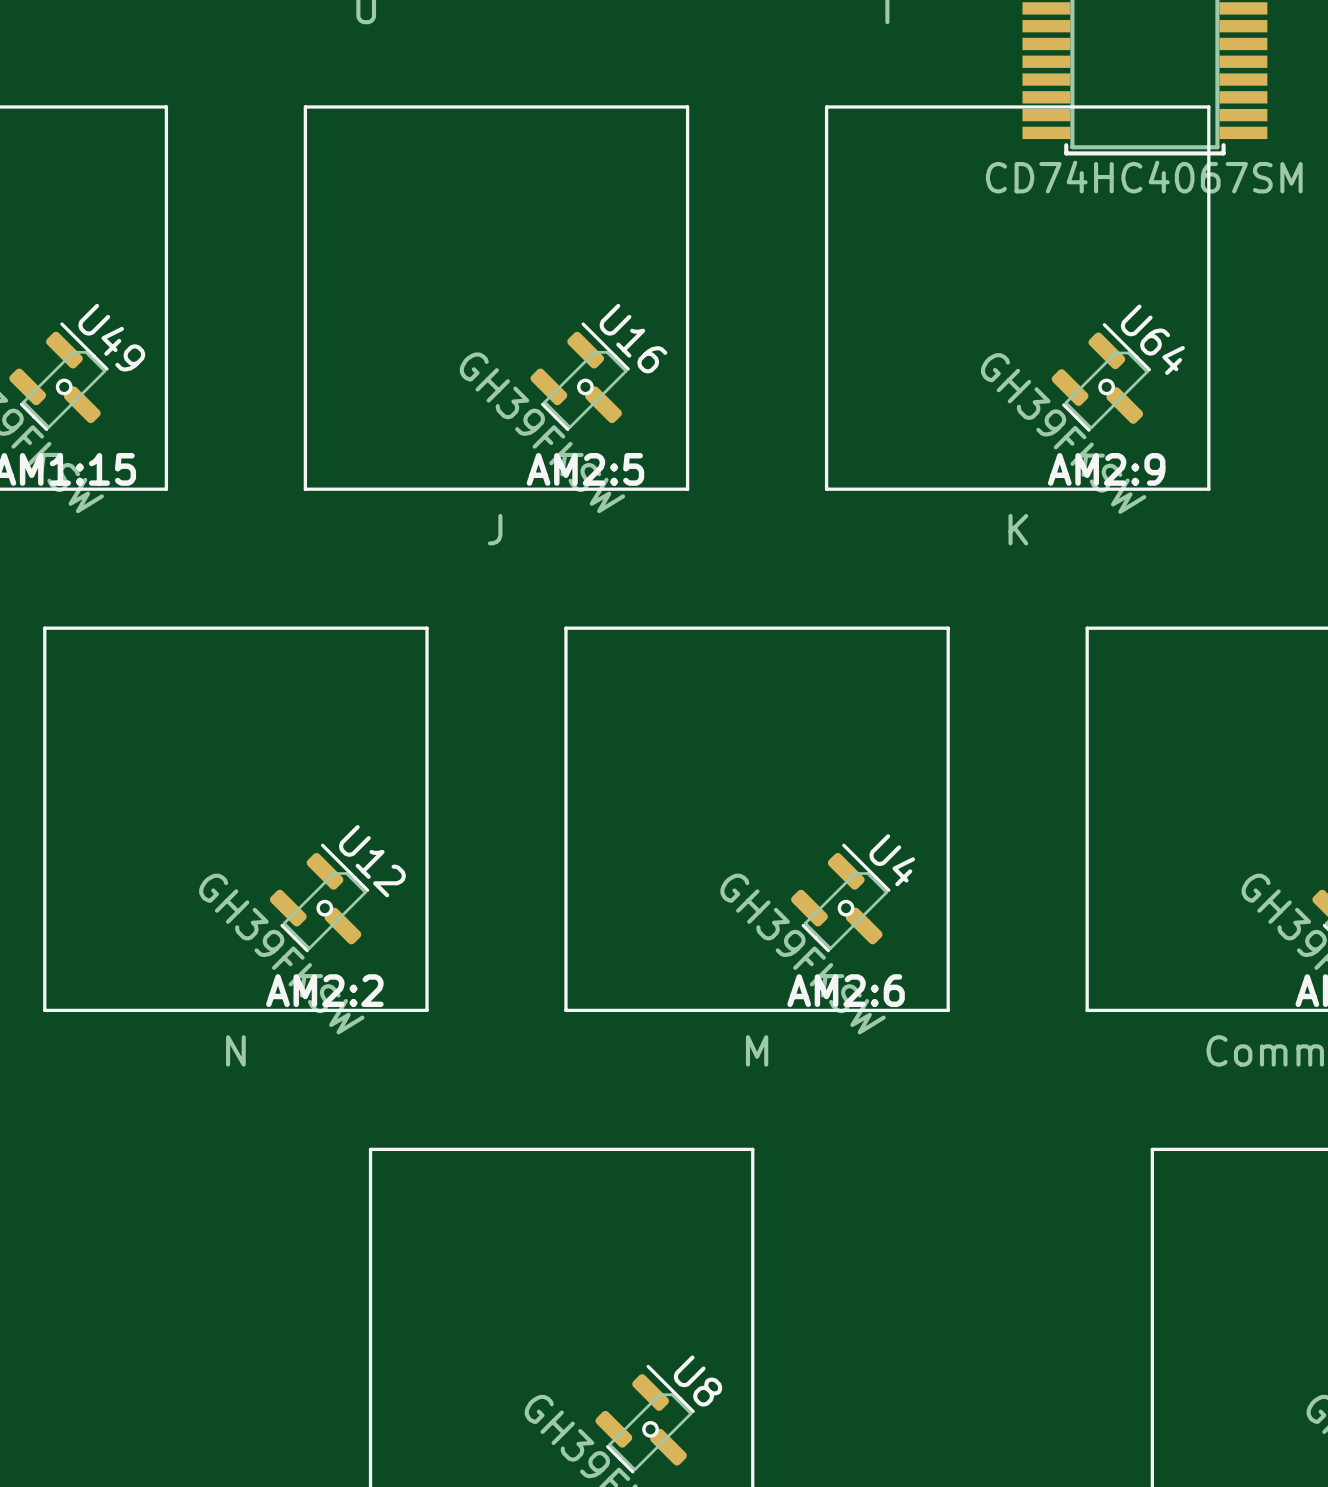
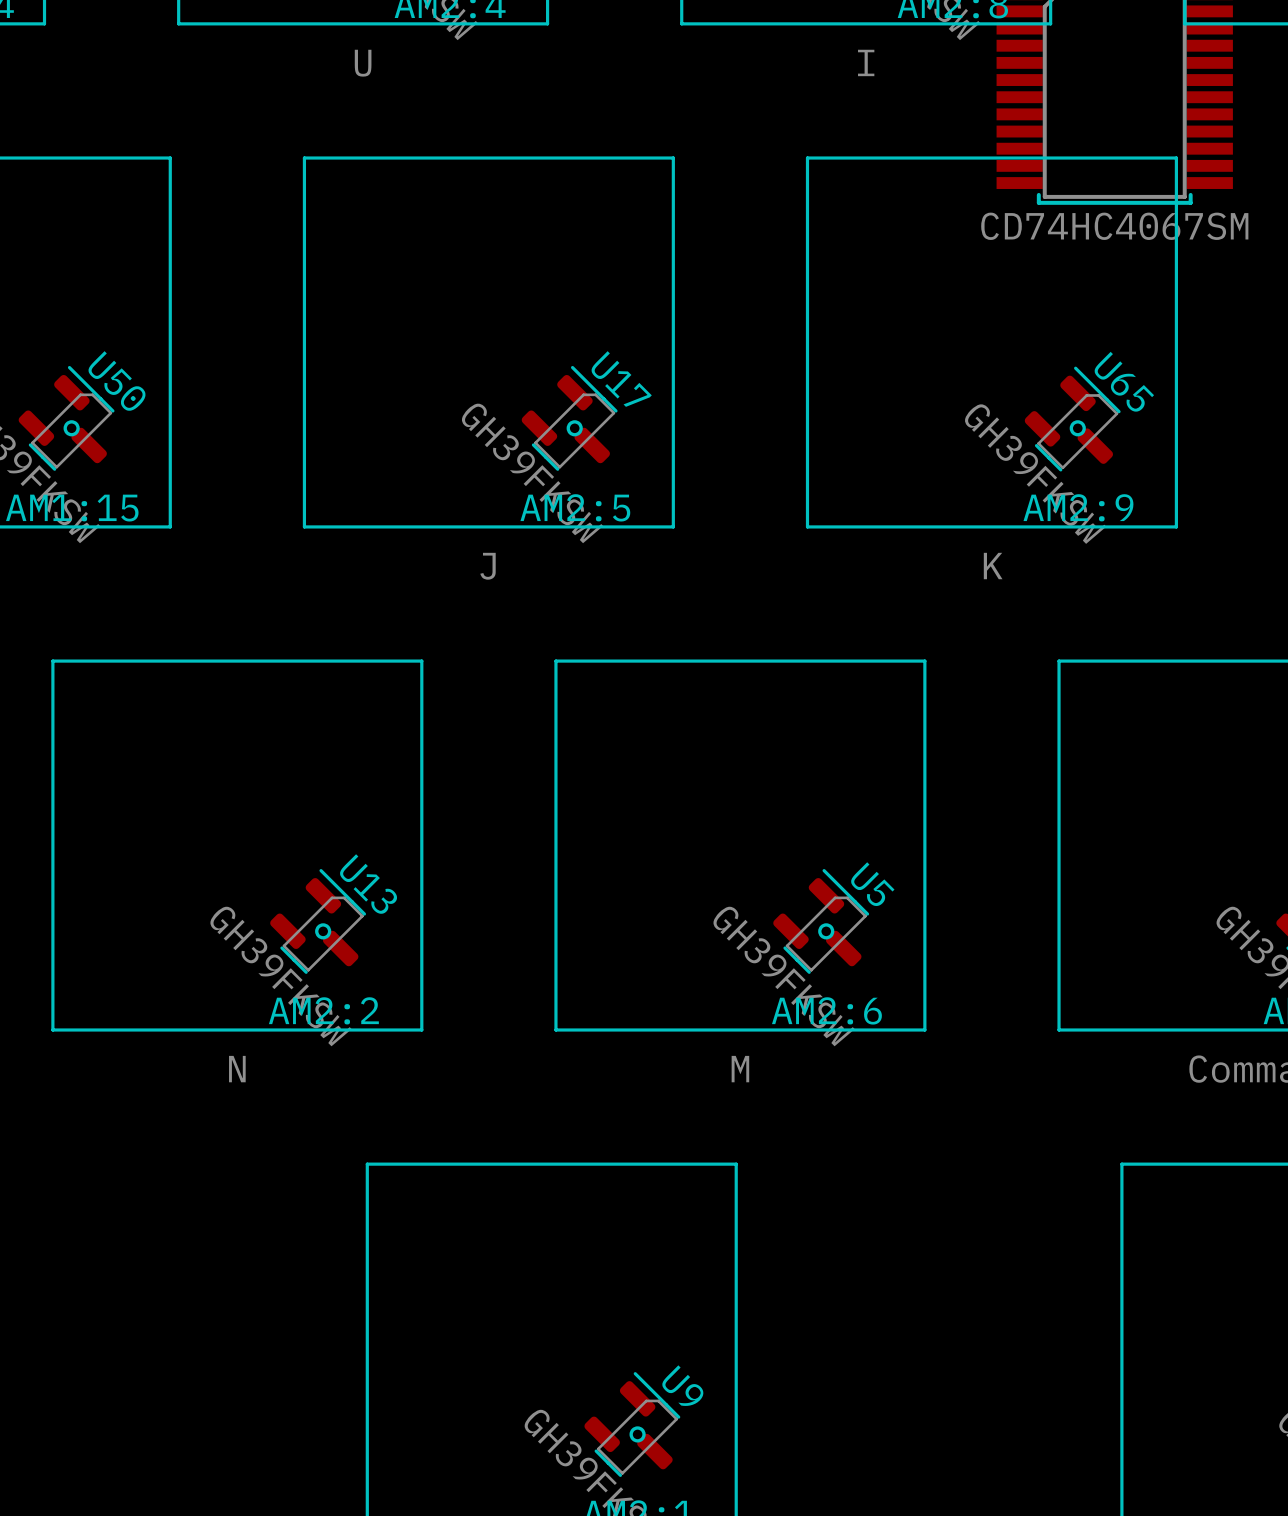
U49 name: U49 (111, 337) -> U50 (117, 381)
U16 name: U16 (633, 338) -> U17 (621, 379)
U64 name: U64 (1152, 339) -> U65 (1124, 381)
U4 name: U4 (892, 860) -> U5 (872, 884)
U12 name: U12 (372, 861) -> U13 (368, 884)
U8 name: U8 (698, 1380) -> U9 (682, 1385)

